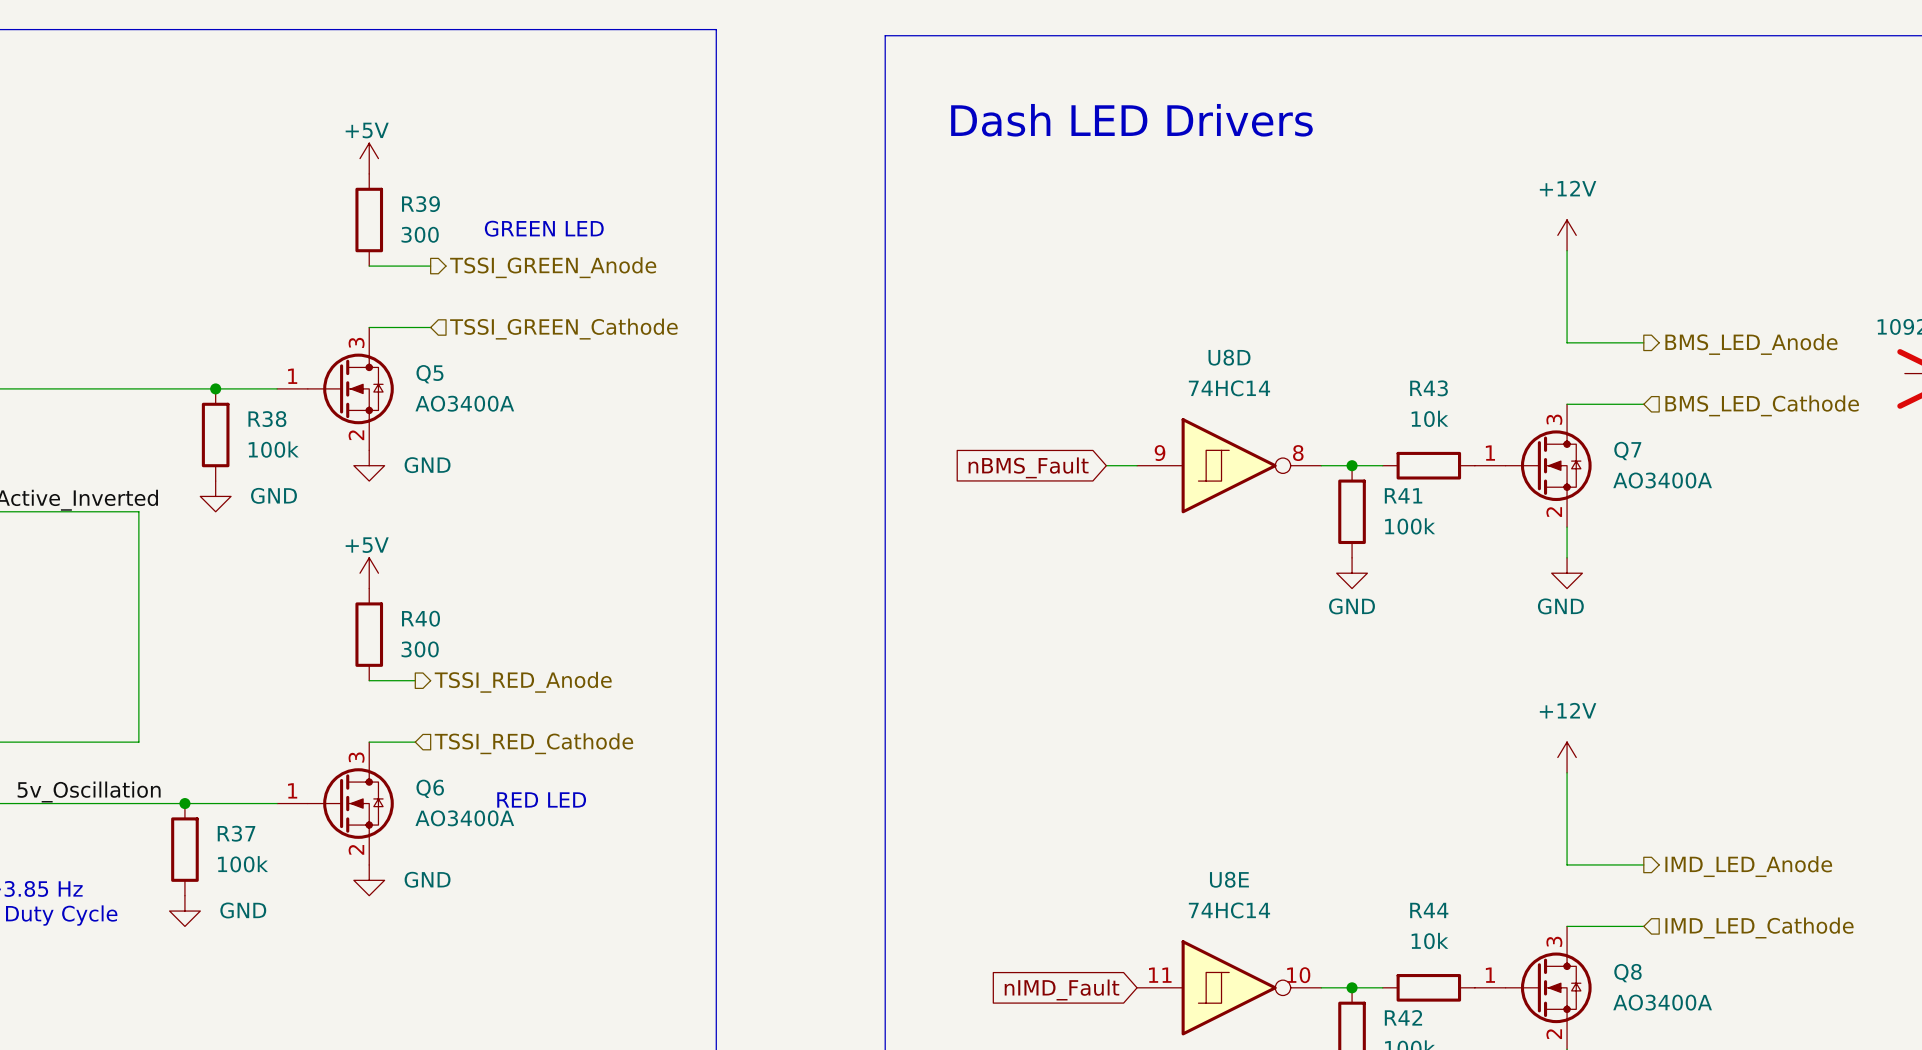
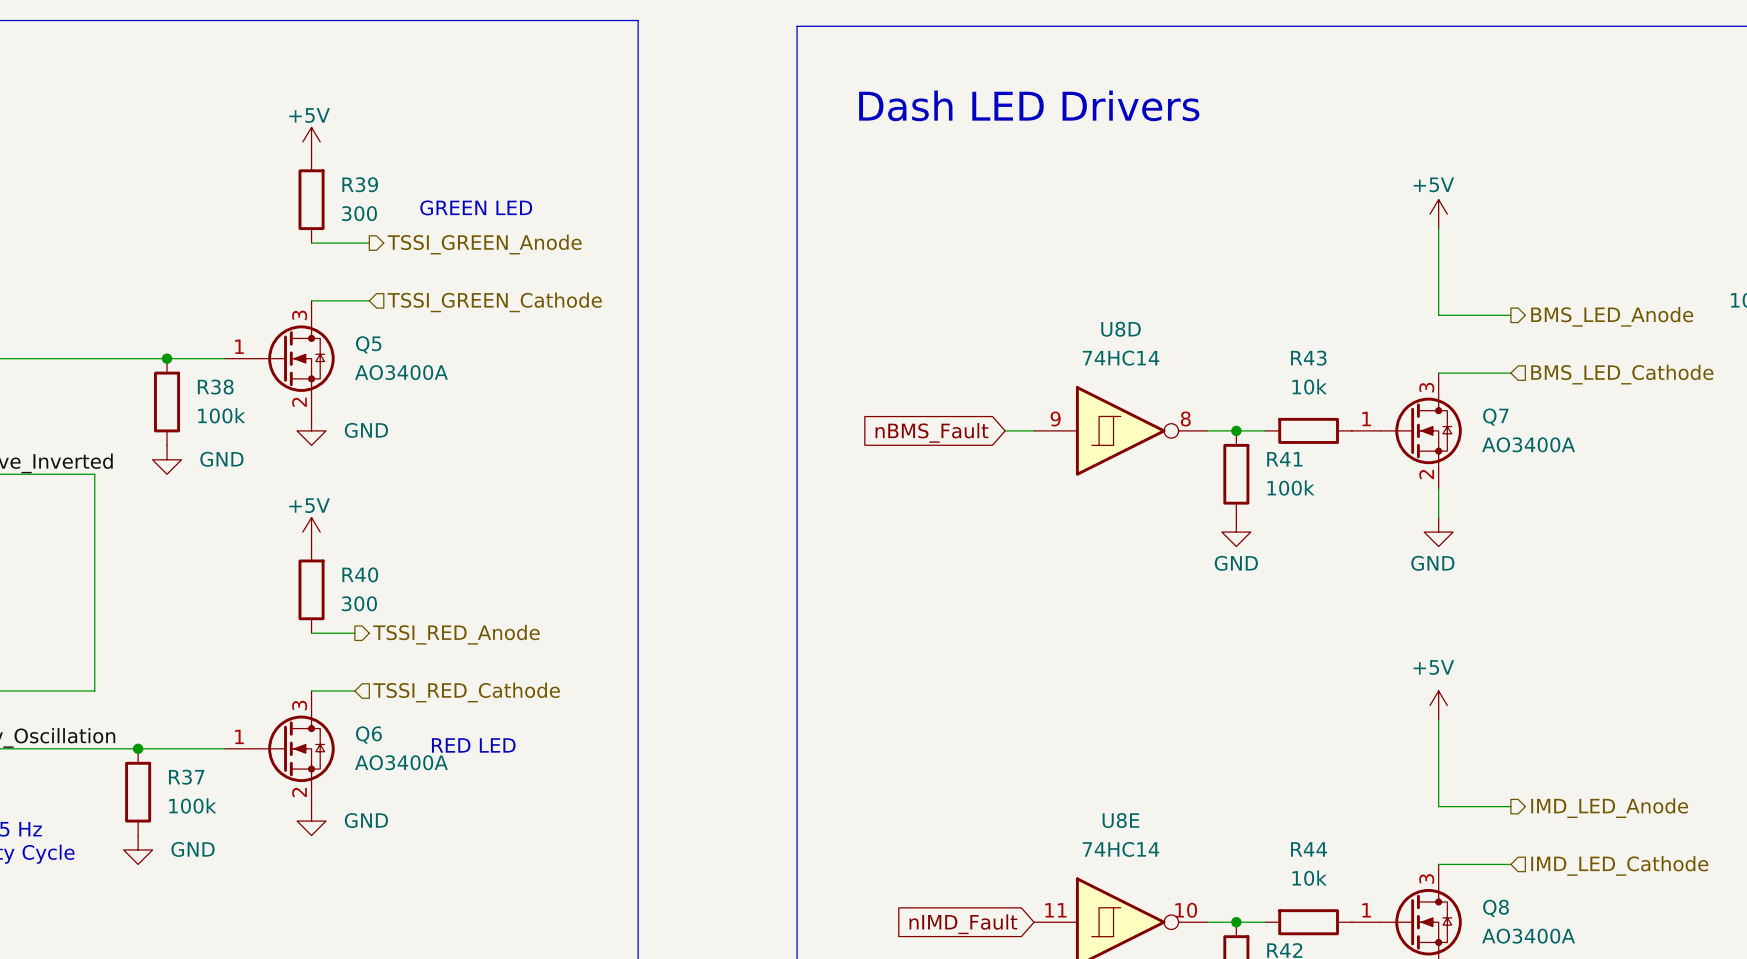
power symbol: +12V (1567, 235) -> +5V (1438, 214)
power symbol: +12V (1567, 757) -> +5V (1438, 705)

